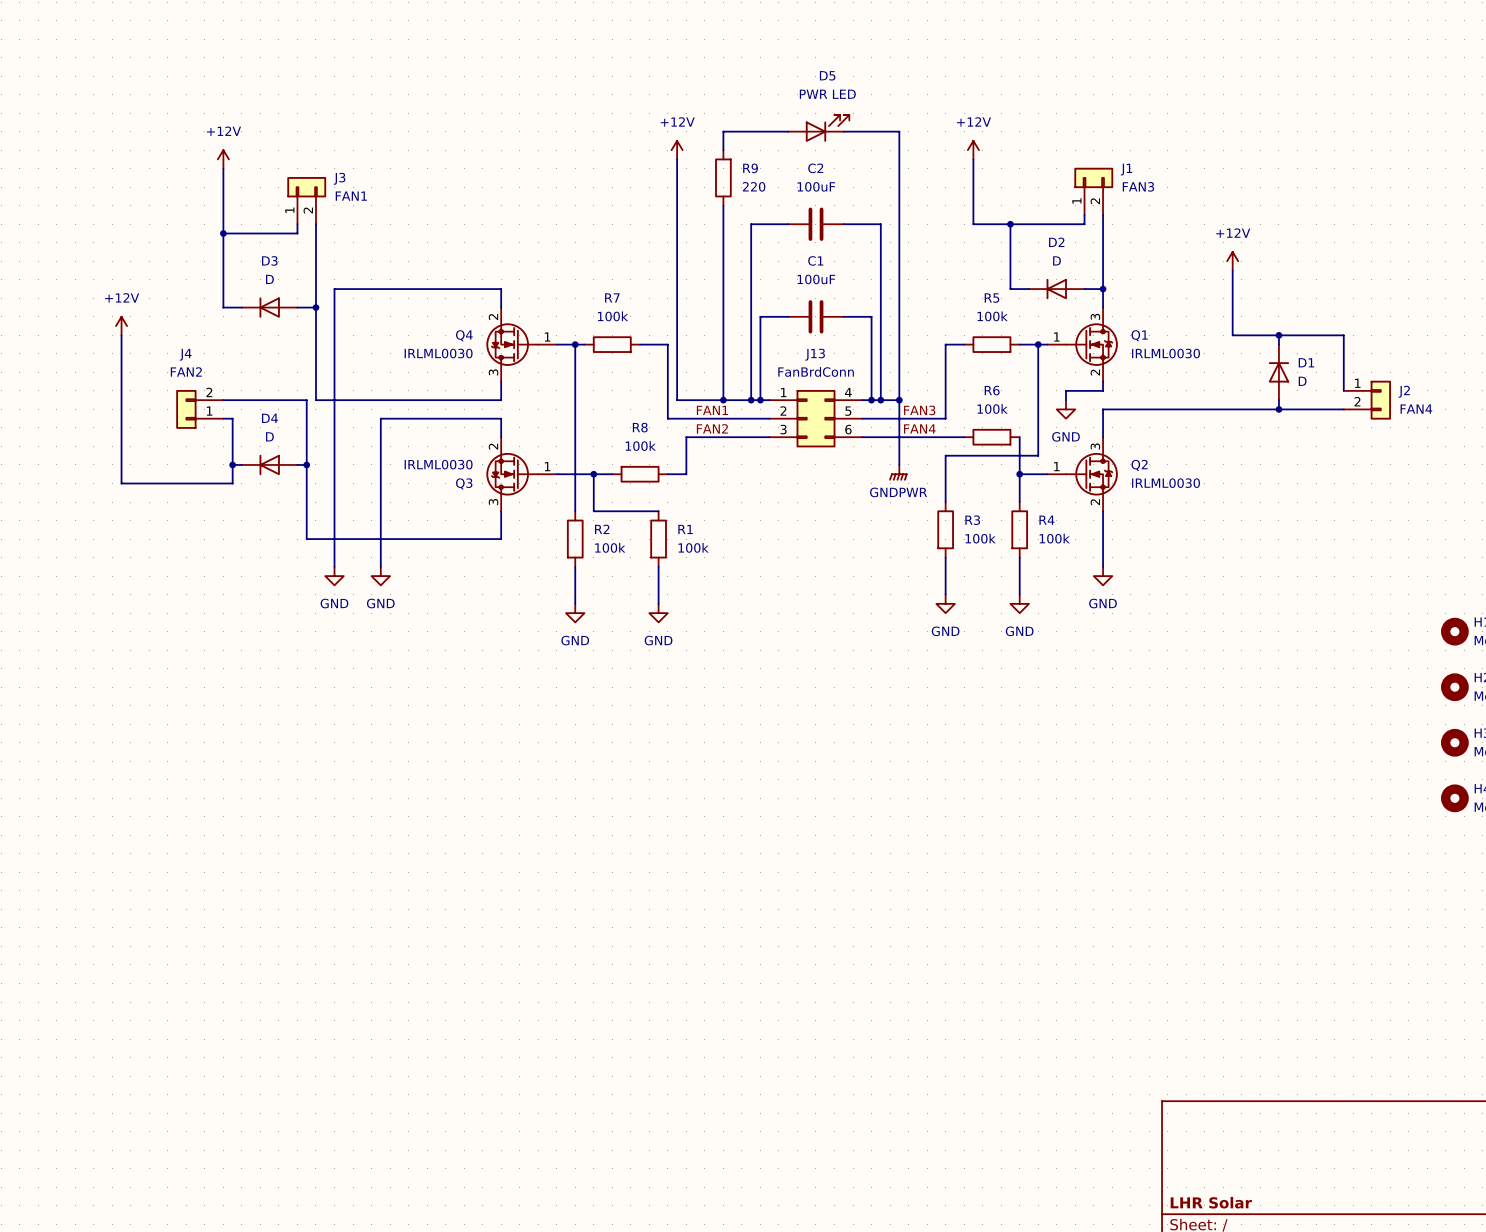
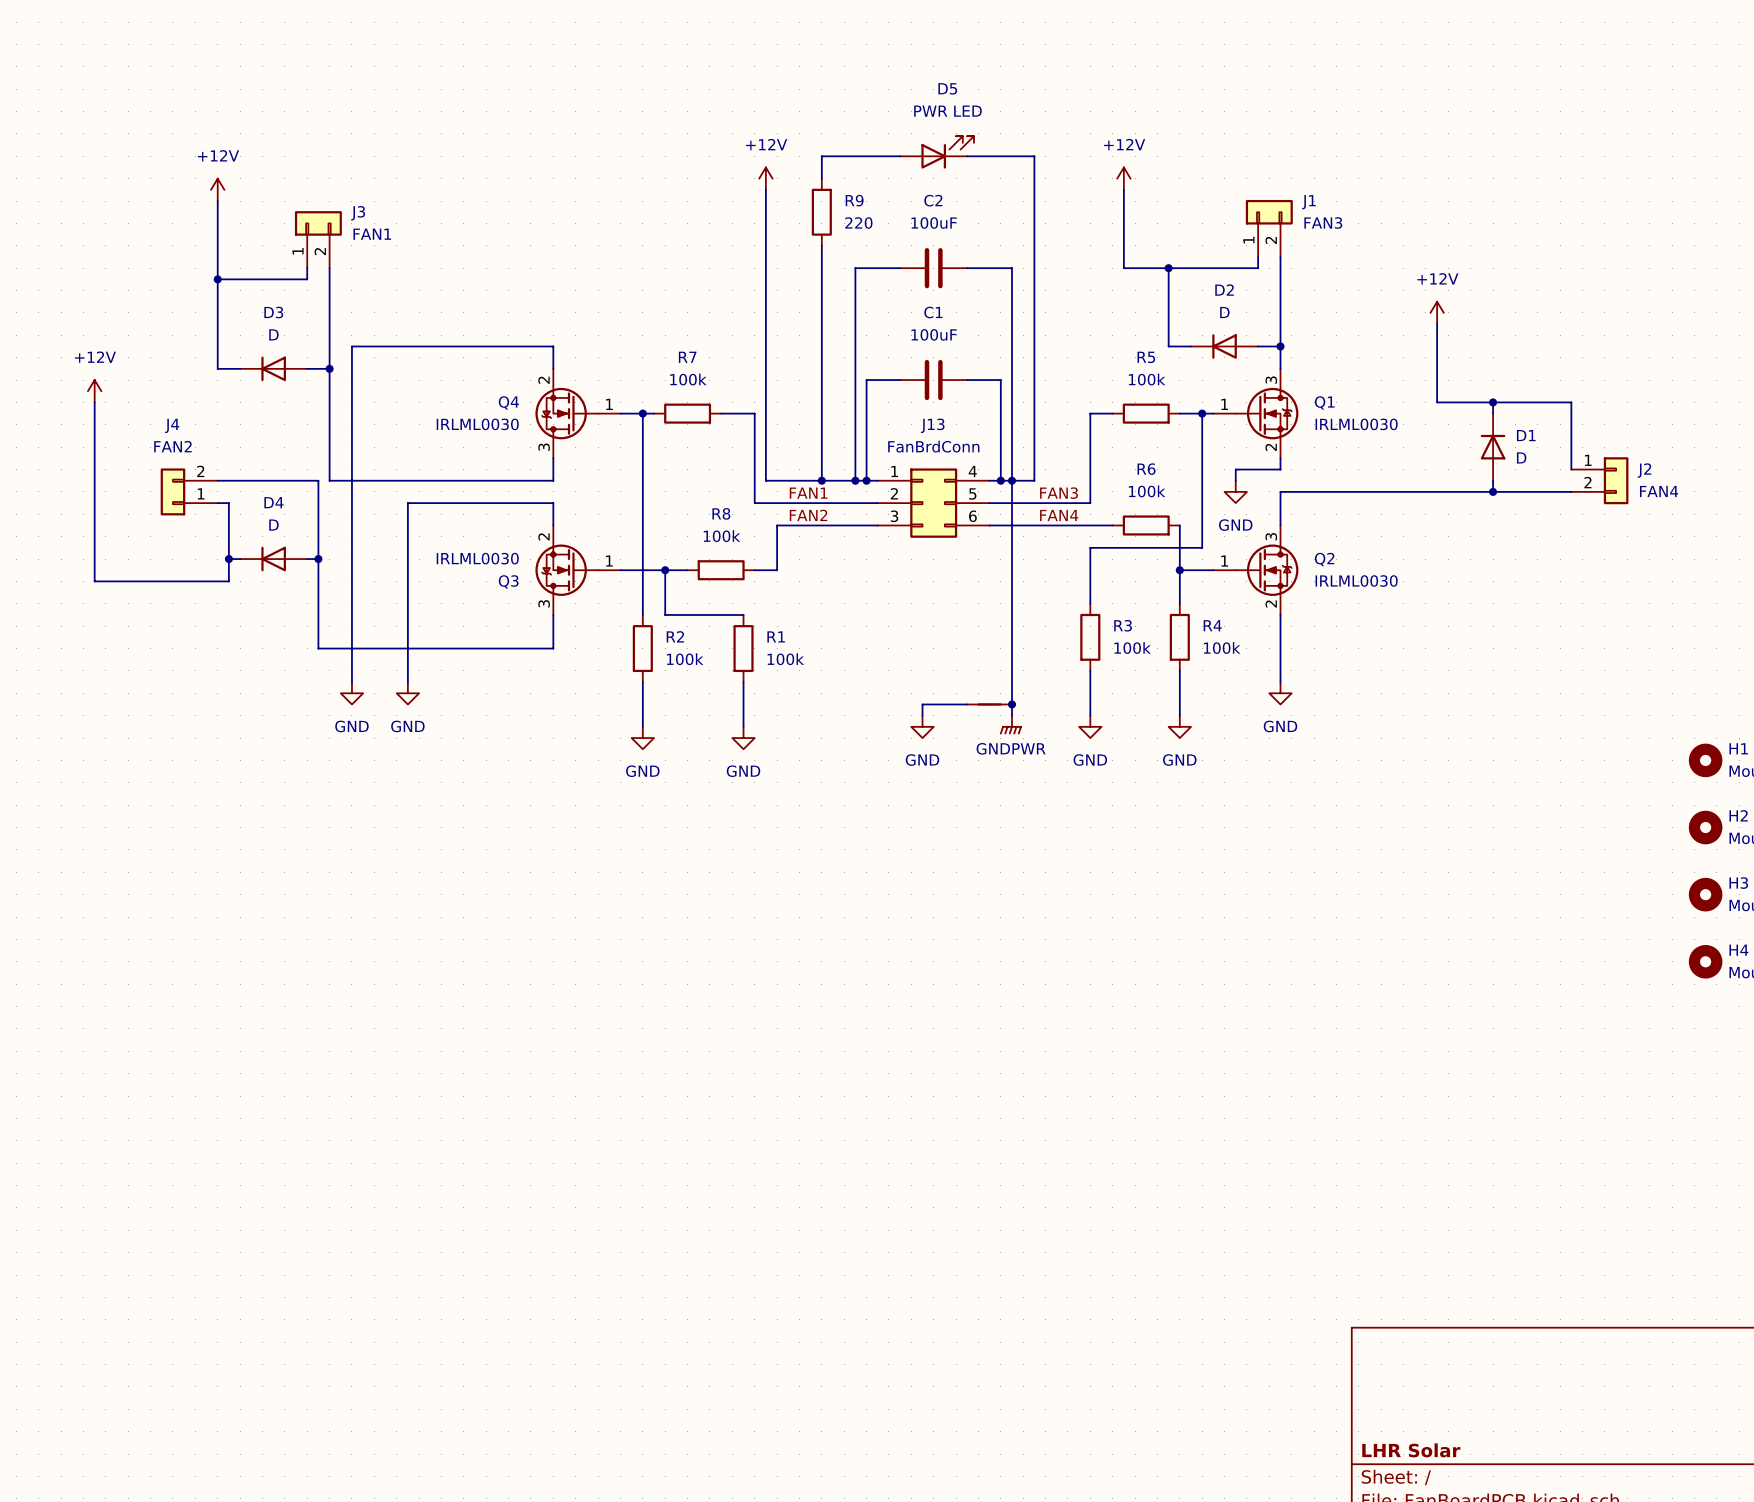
wire: none -> (1012, 480) (1012, 715)
wire: (899, 400) (899, 464) -> none
junction: (899, 400) -> none
power symbol position: GNDPWR (898, 472) -> GNDPWR (1010, 725)
wire: none -> (967, 704) (922, 704) (922, 715)
part: none -> (989, 704)
junction: none -> (1012, 704)
power symbol: none -> GND (922, 726)

